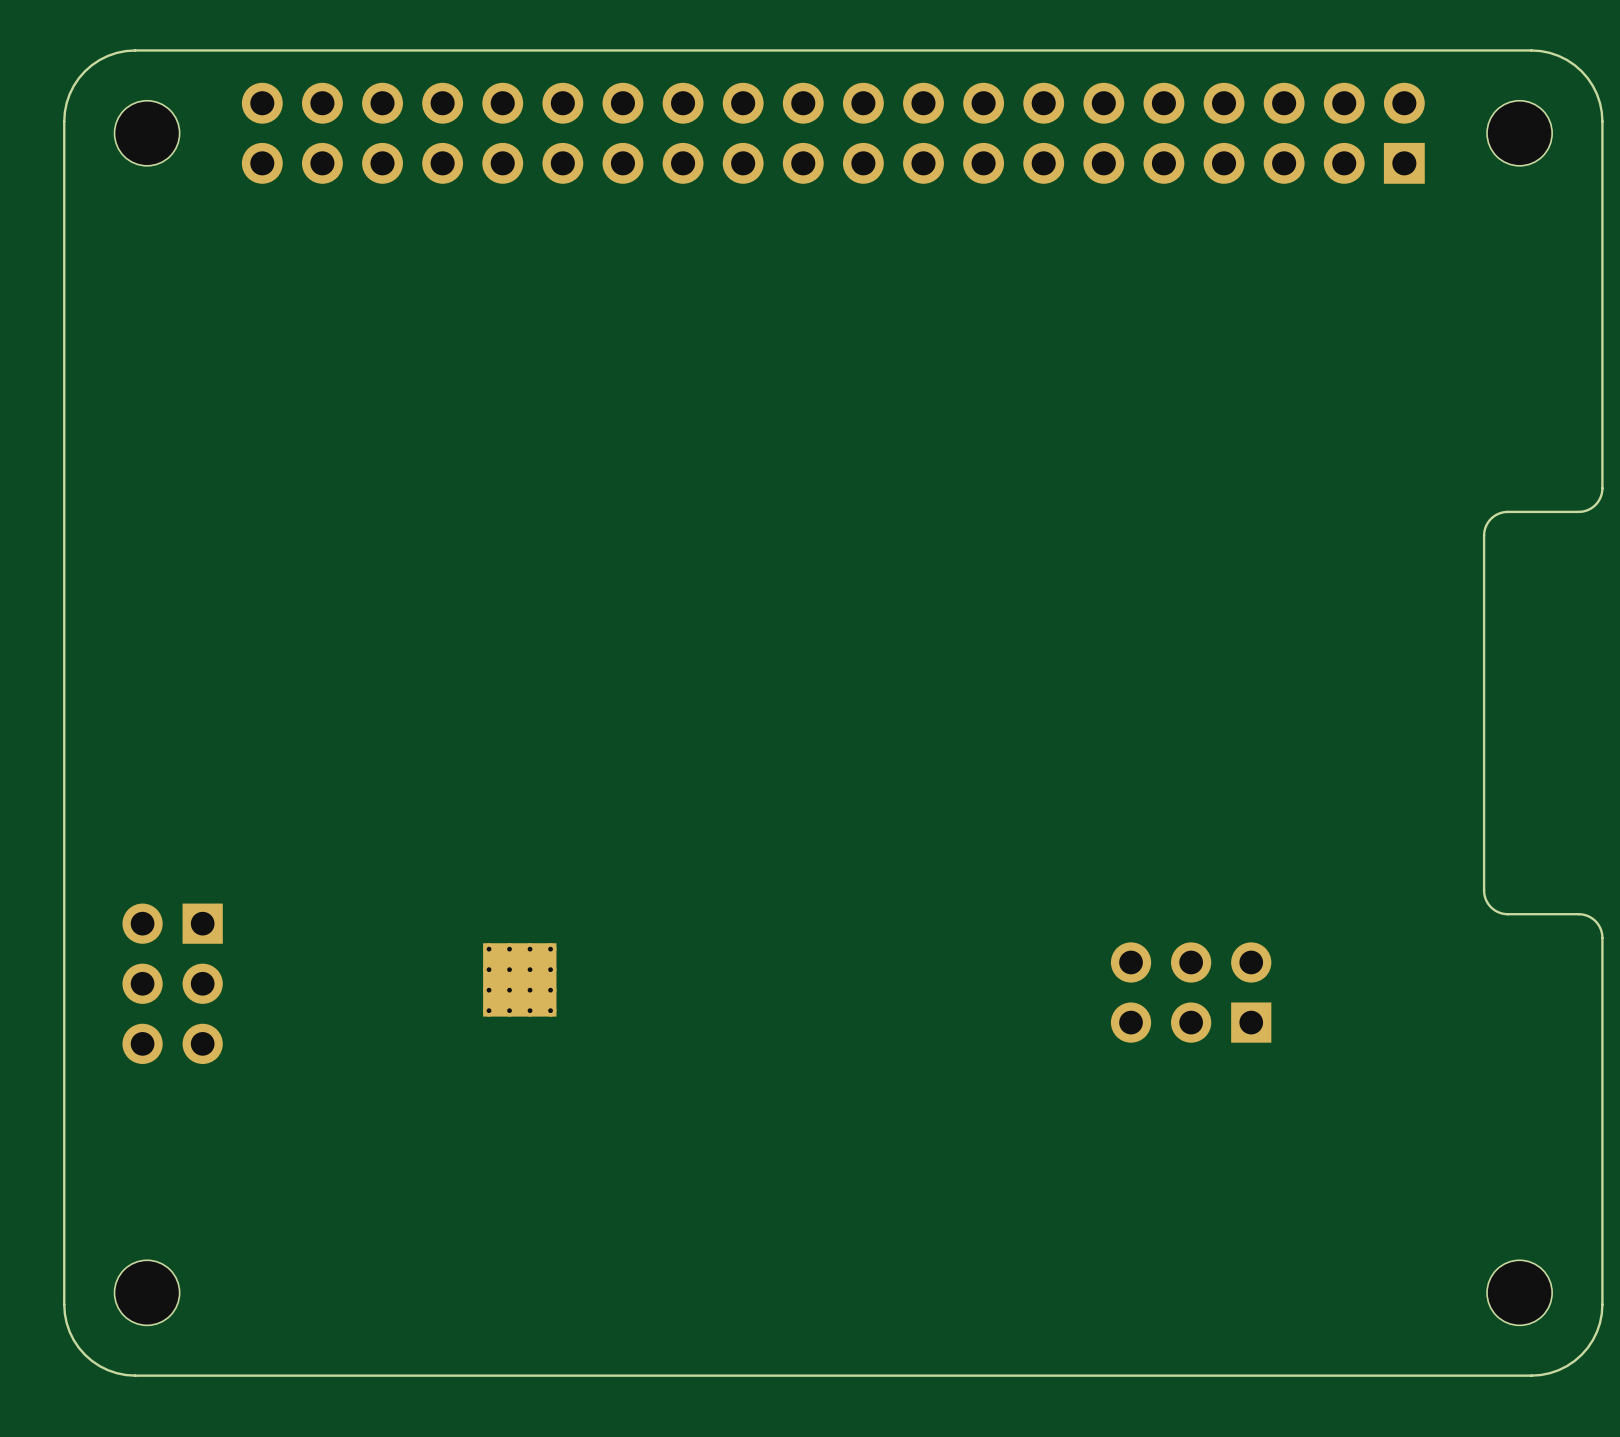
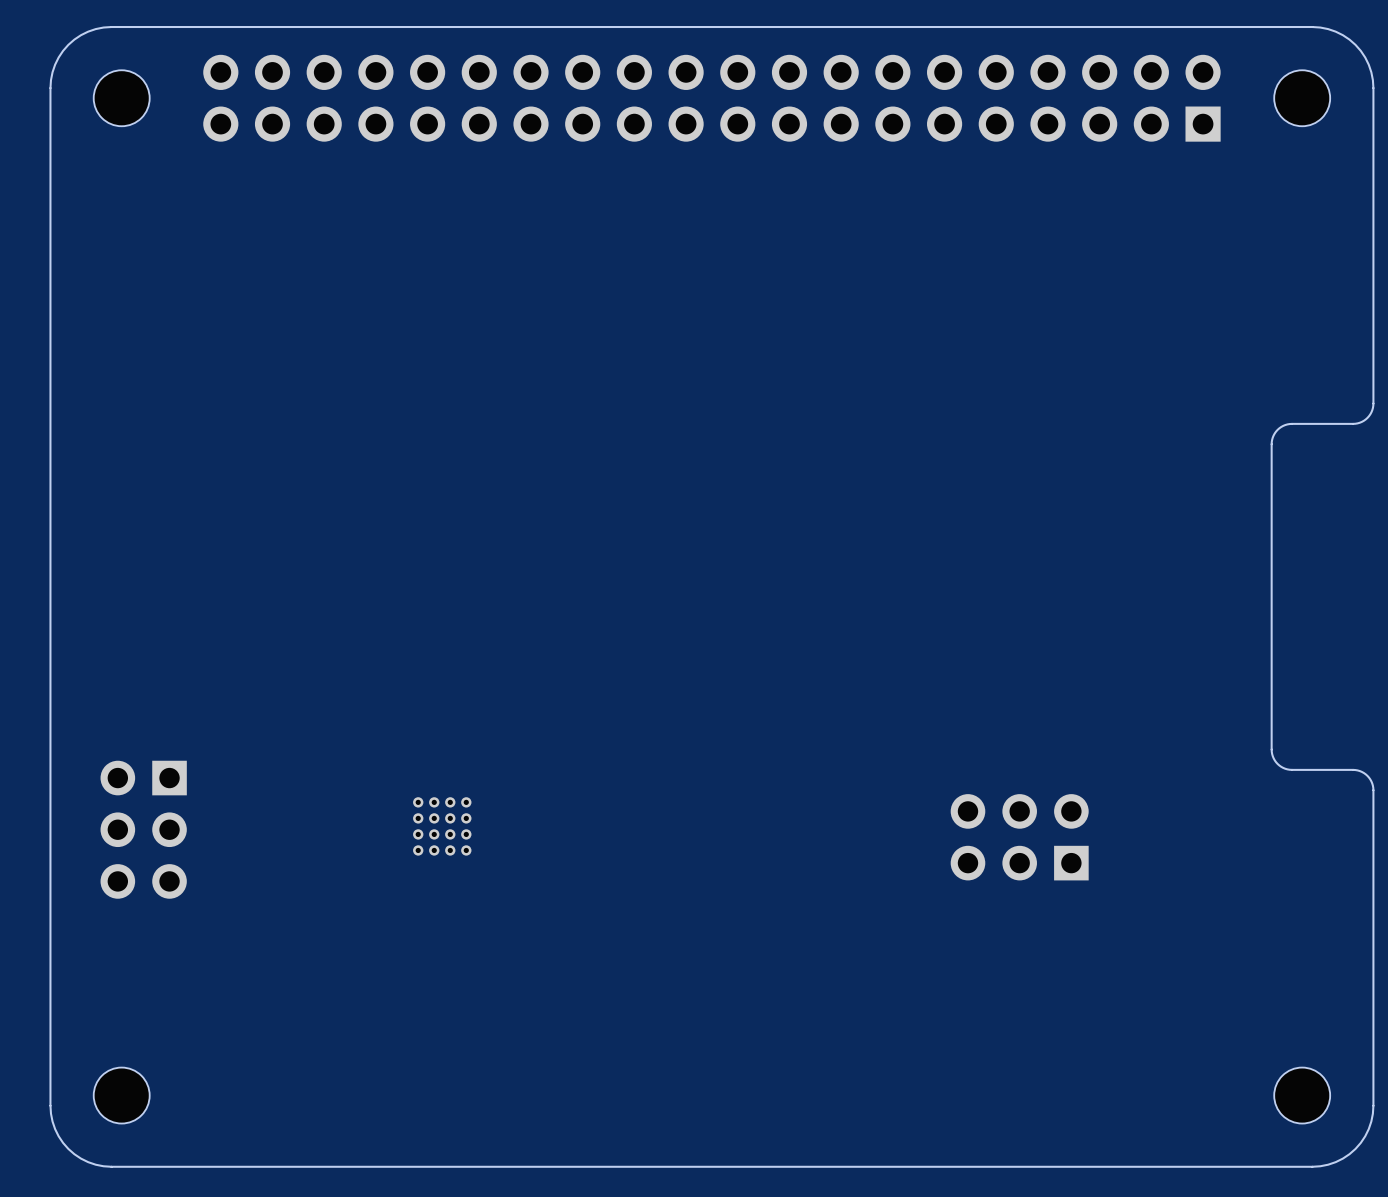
part footprint: [483, 943, 557, 1017] -> [413, 797, 472, 856]

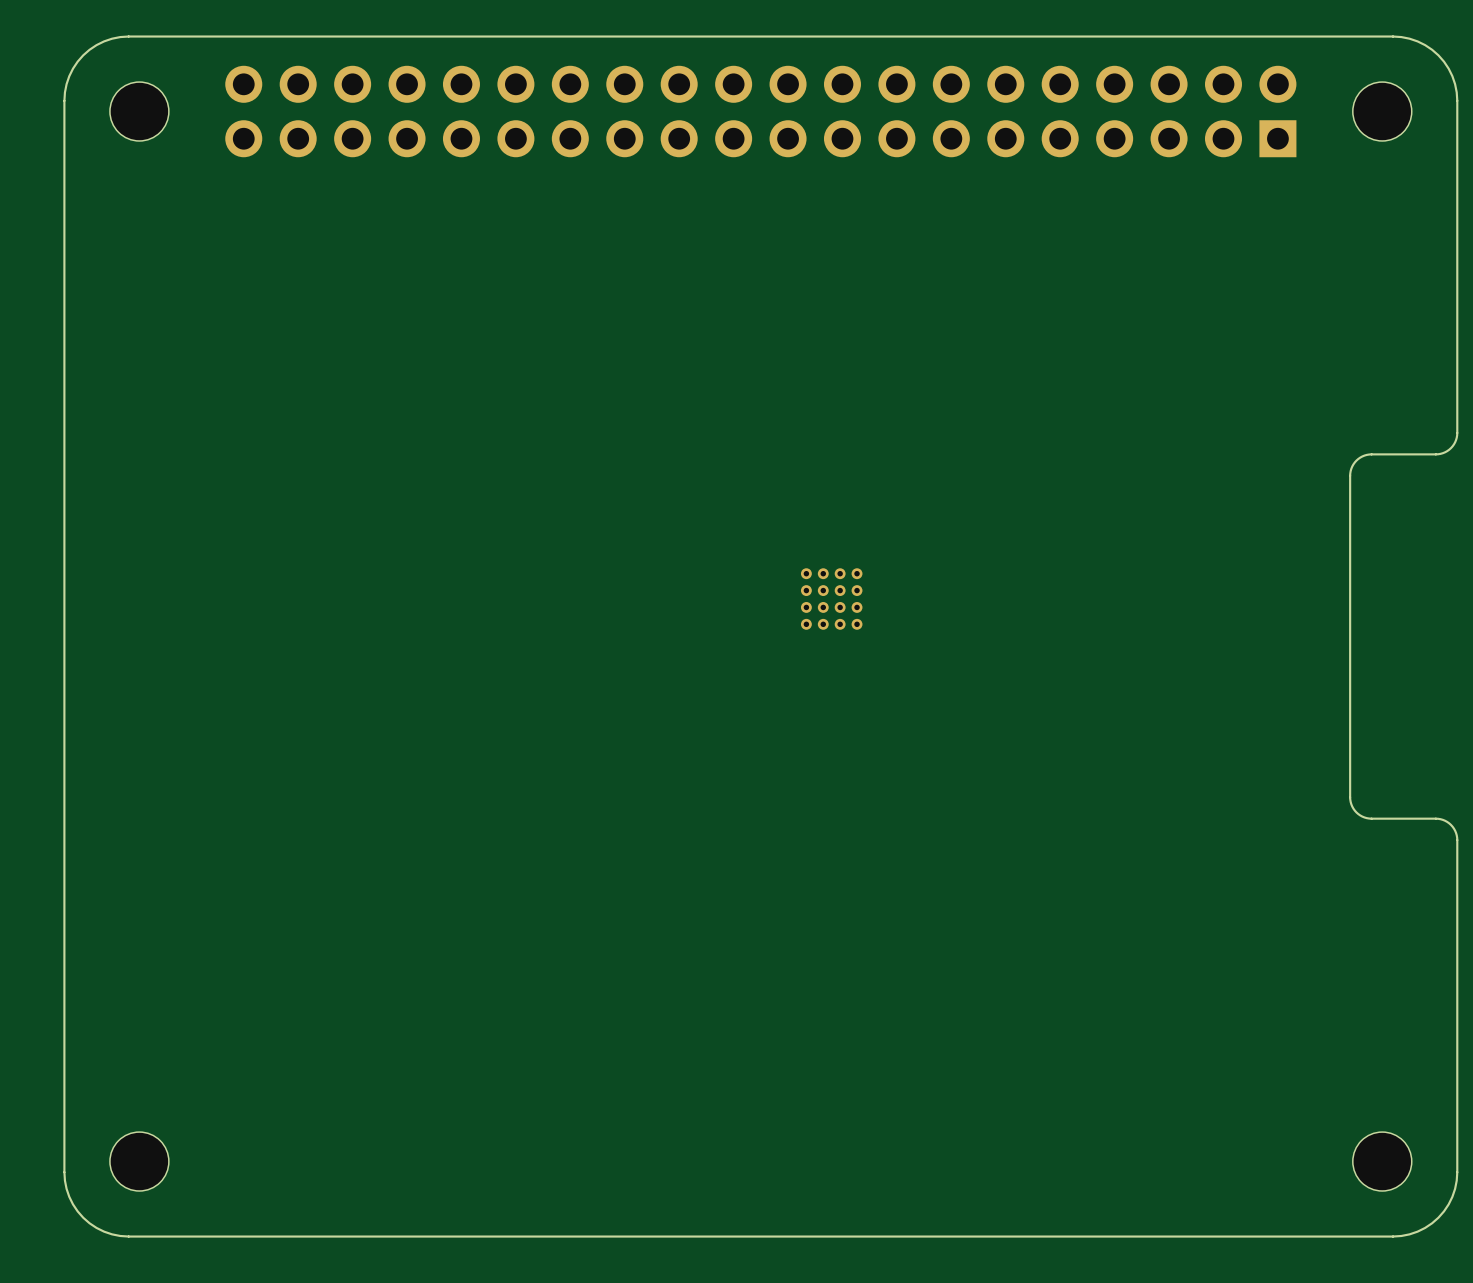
part position: (442, 826) -> (831, 599)
part: (143, 829) -> none
part: (1019, 837) -> none

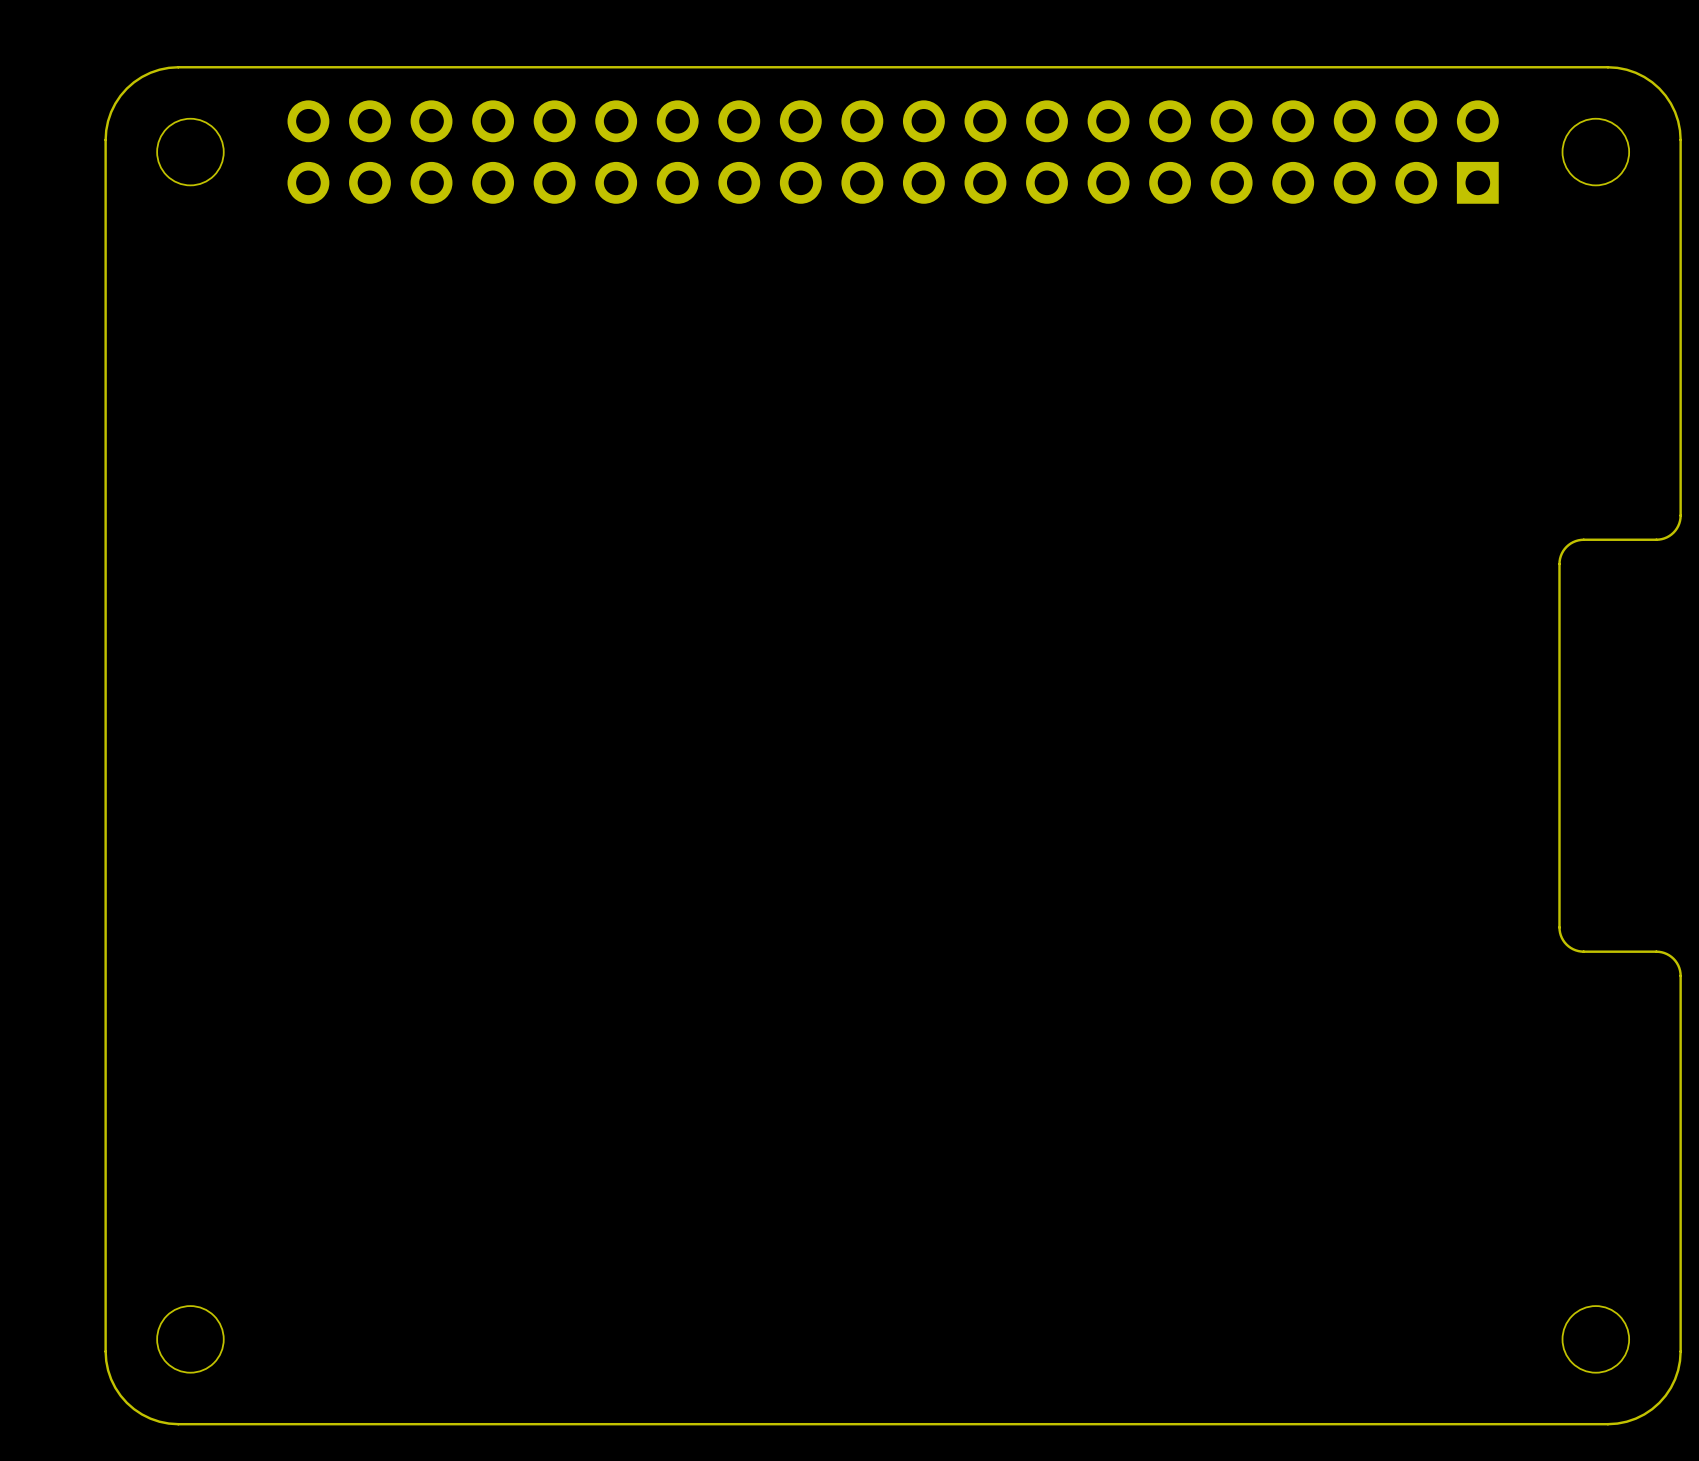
part: (831, 599) -> none

